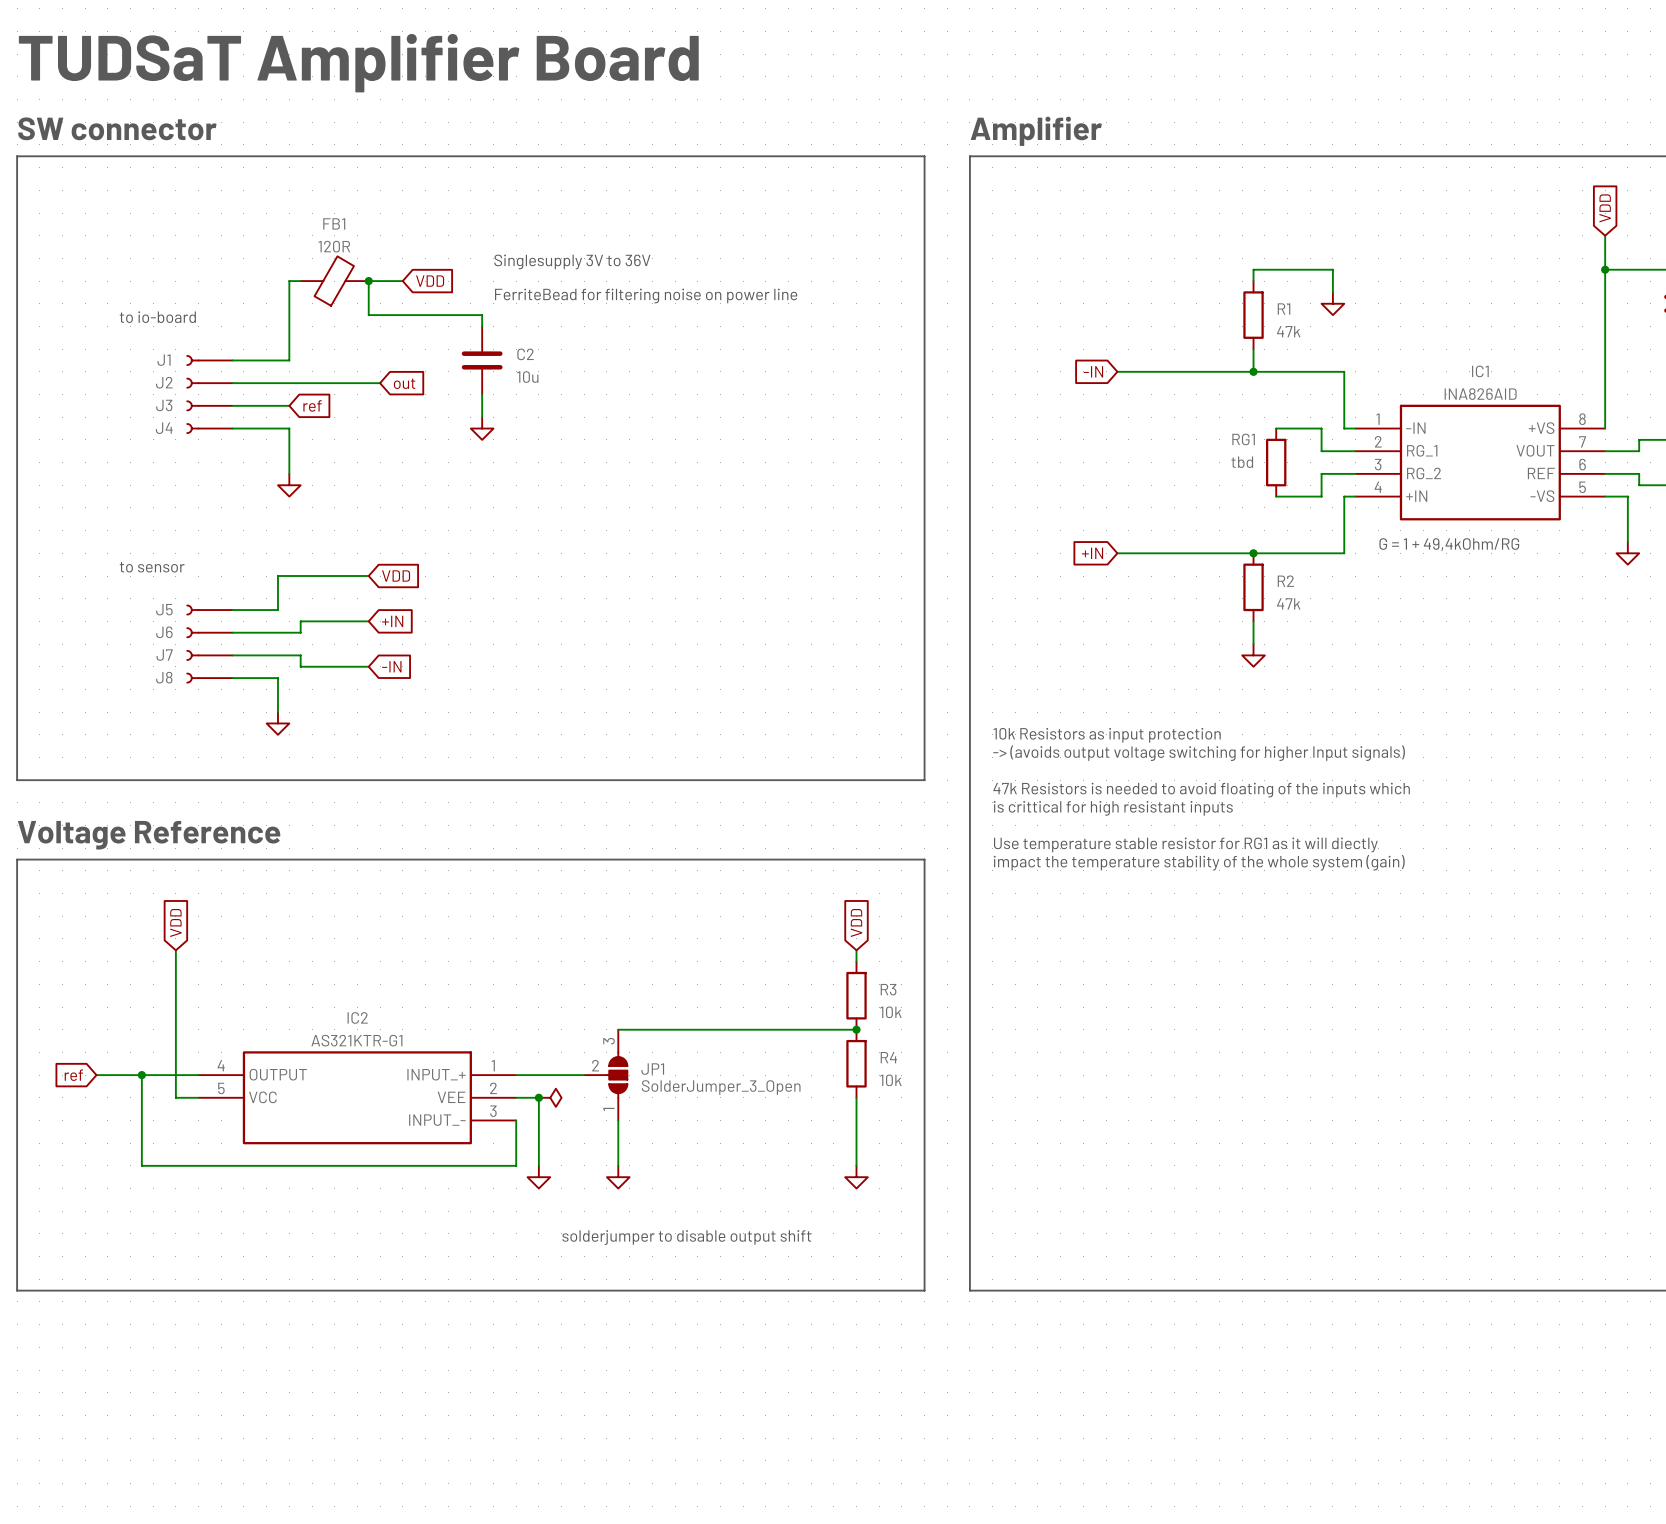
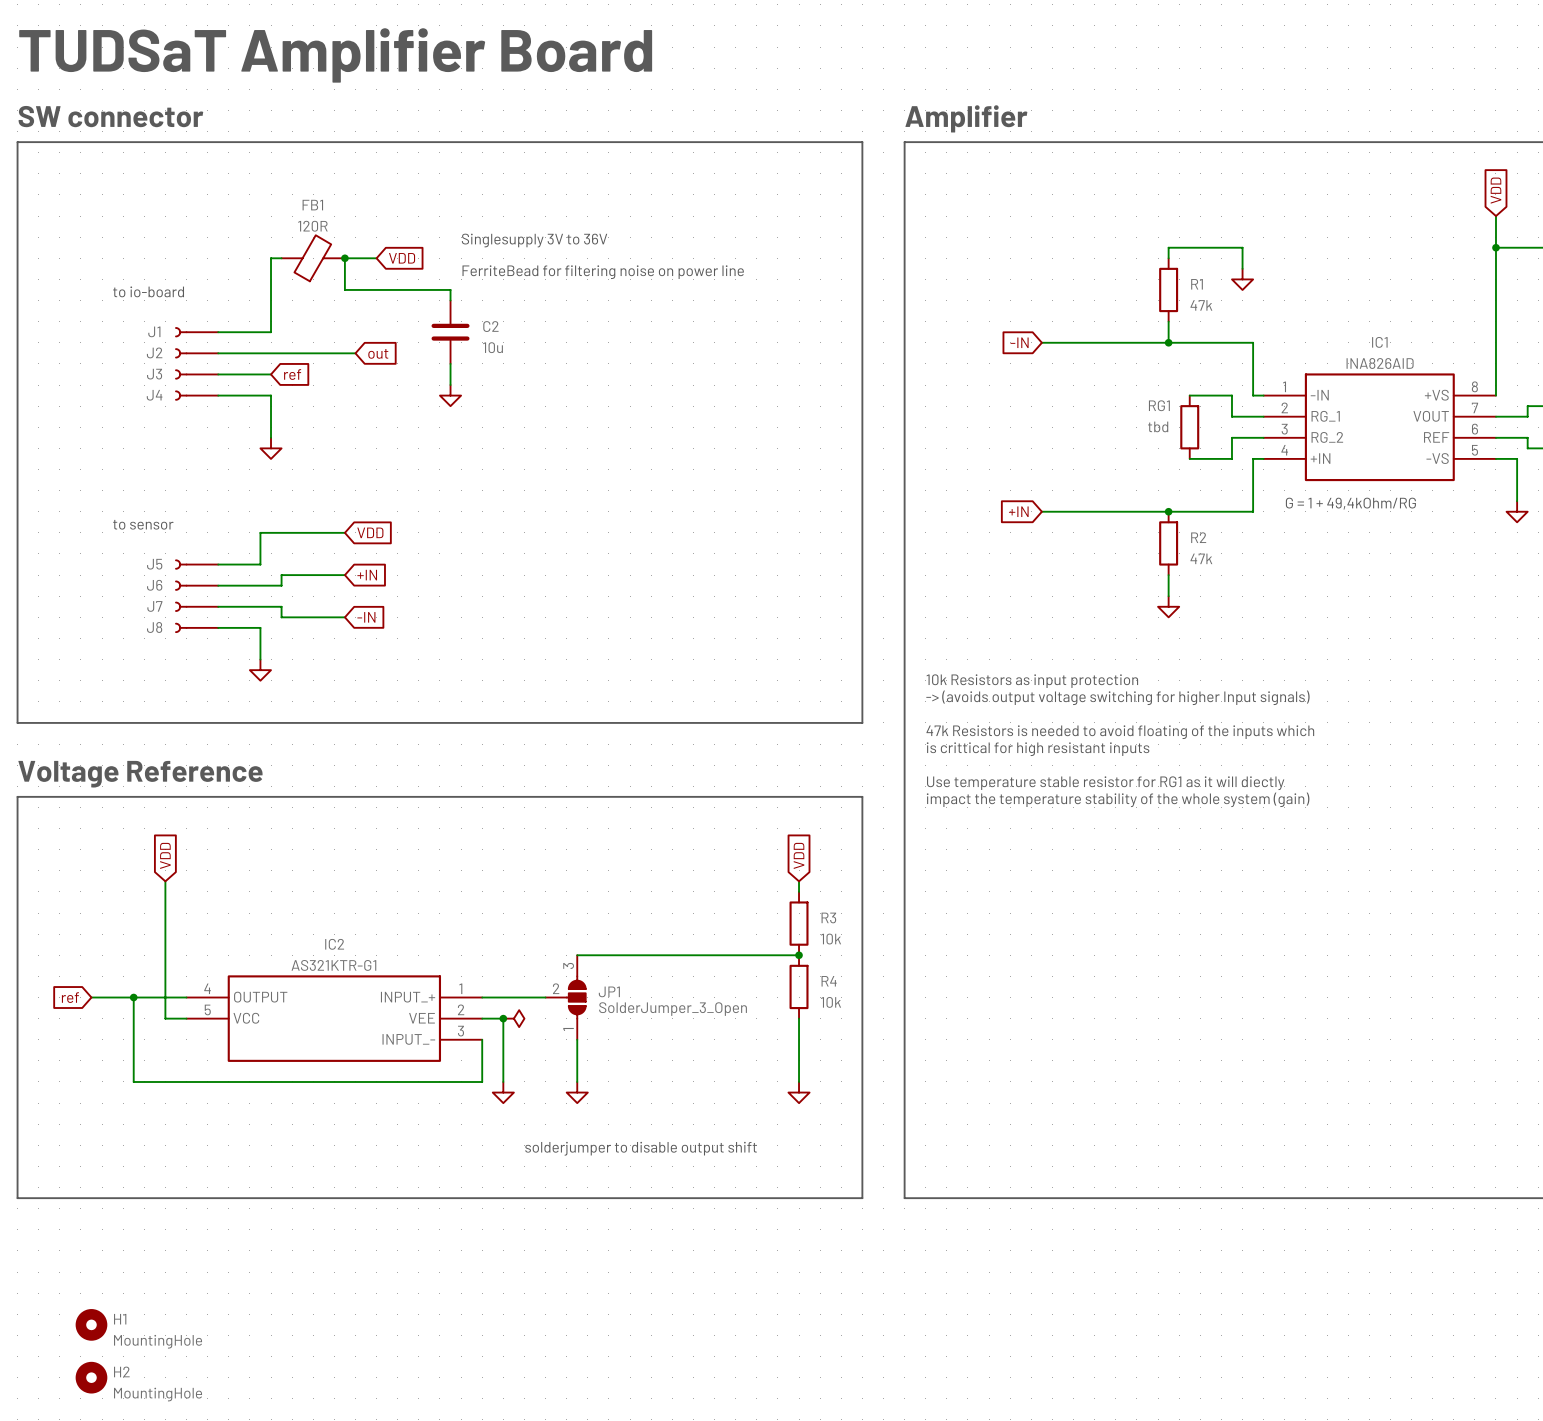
H1: none -> MountingHole (91, 1324)
H2: none -> MountingHole (91, 1377)

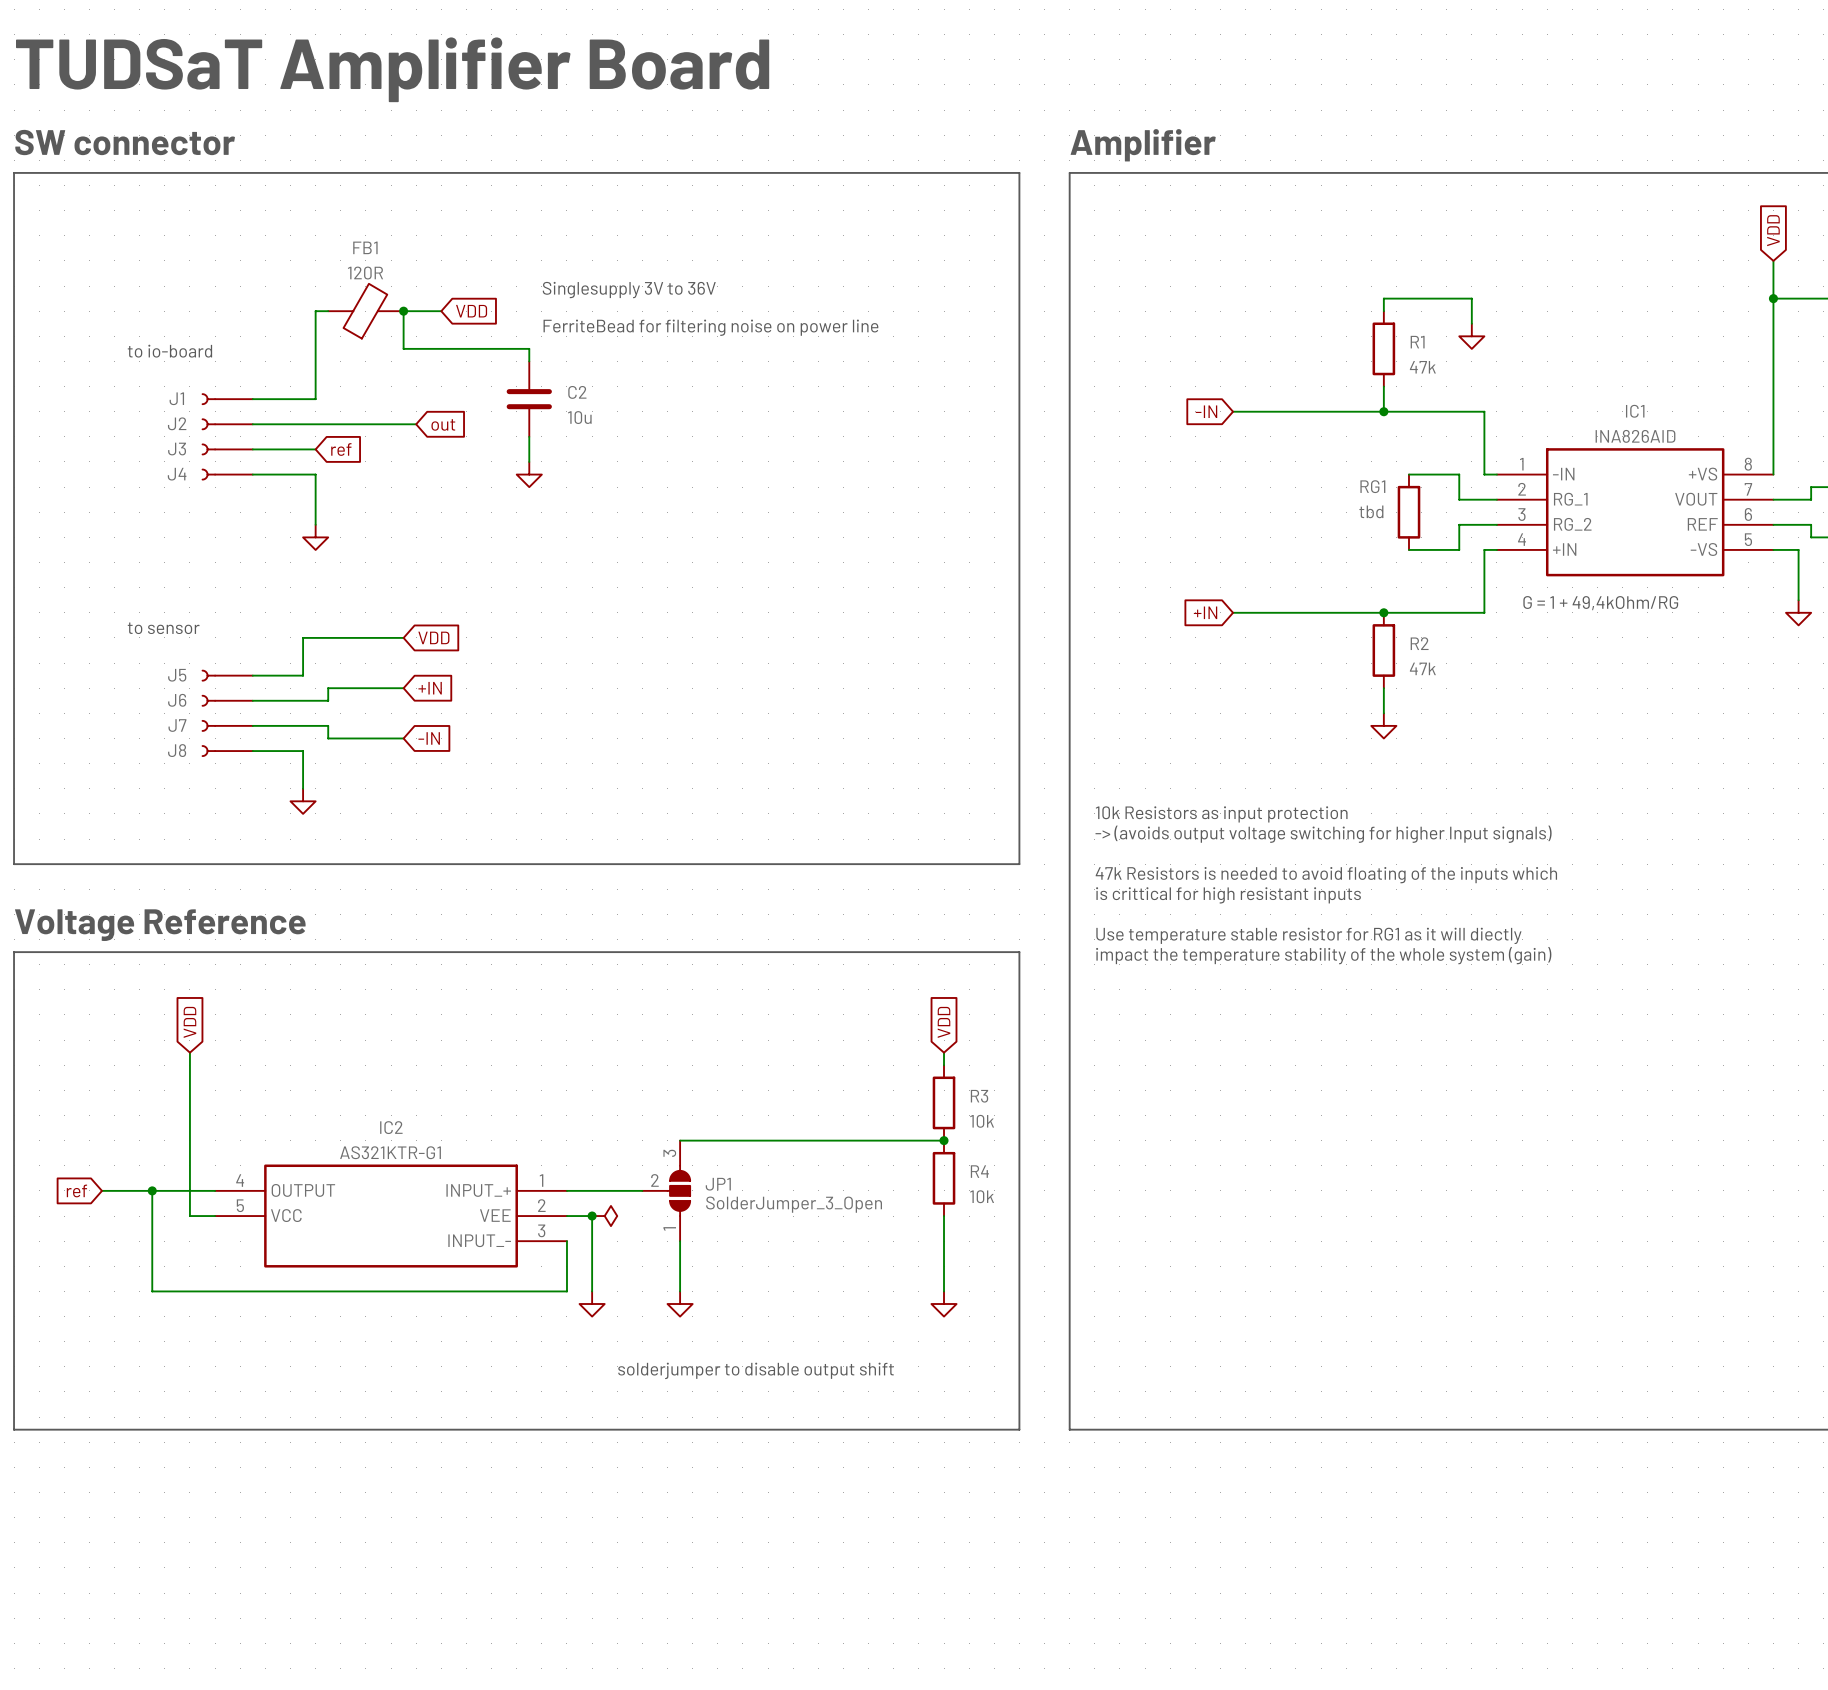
H1: MountingHole (91, 1324) -> none
H2: MountingHole (91, 1377) -> none

